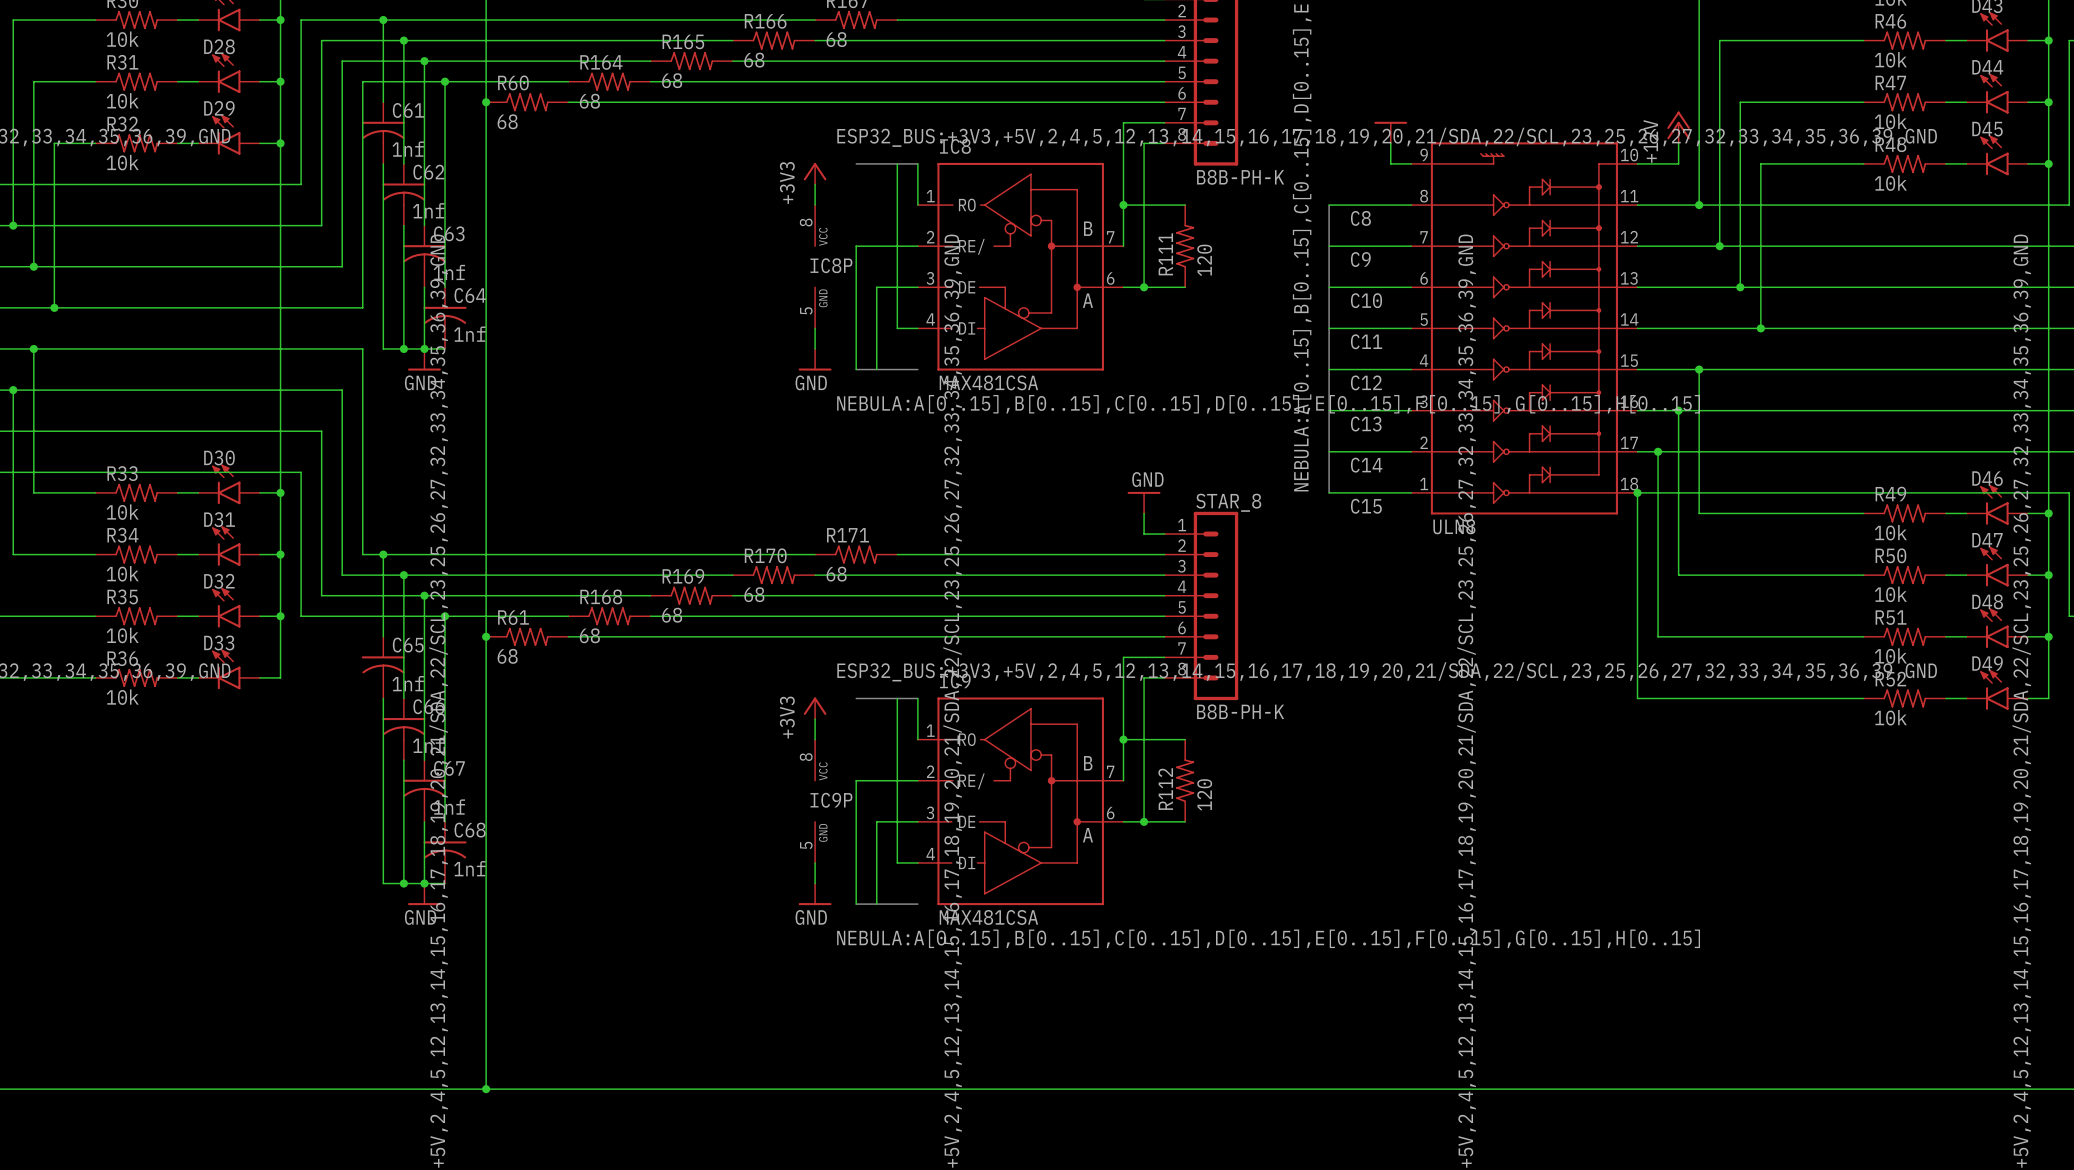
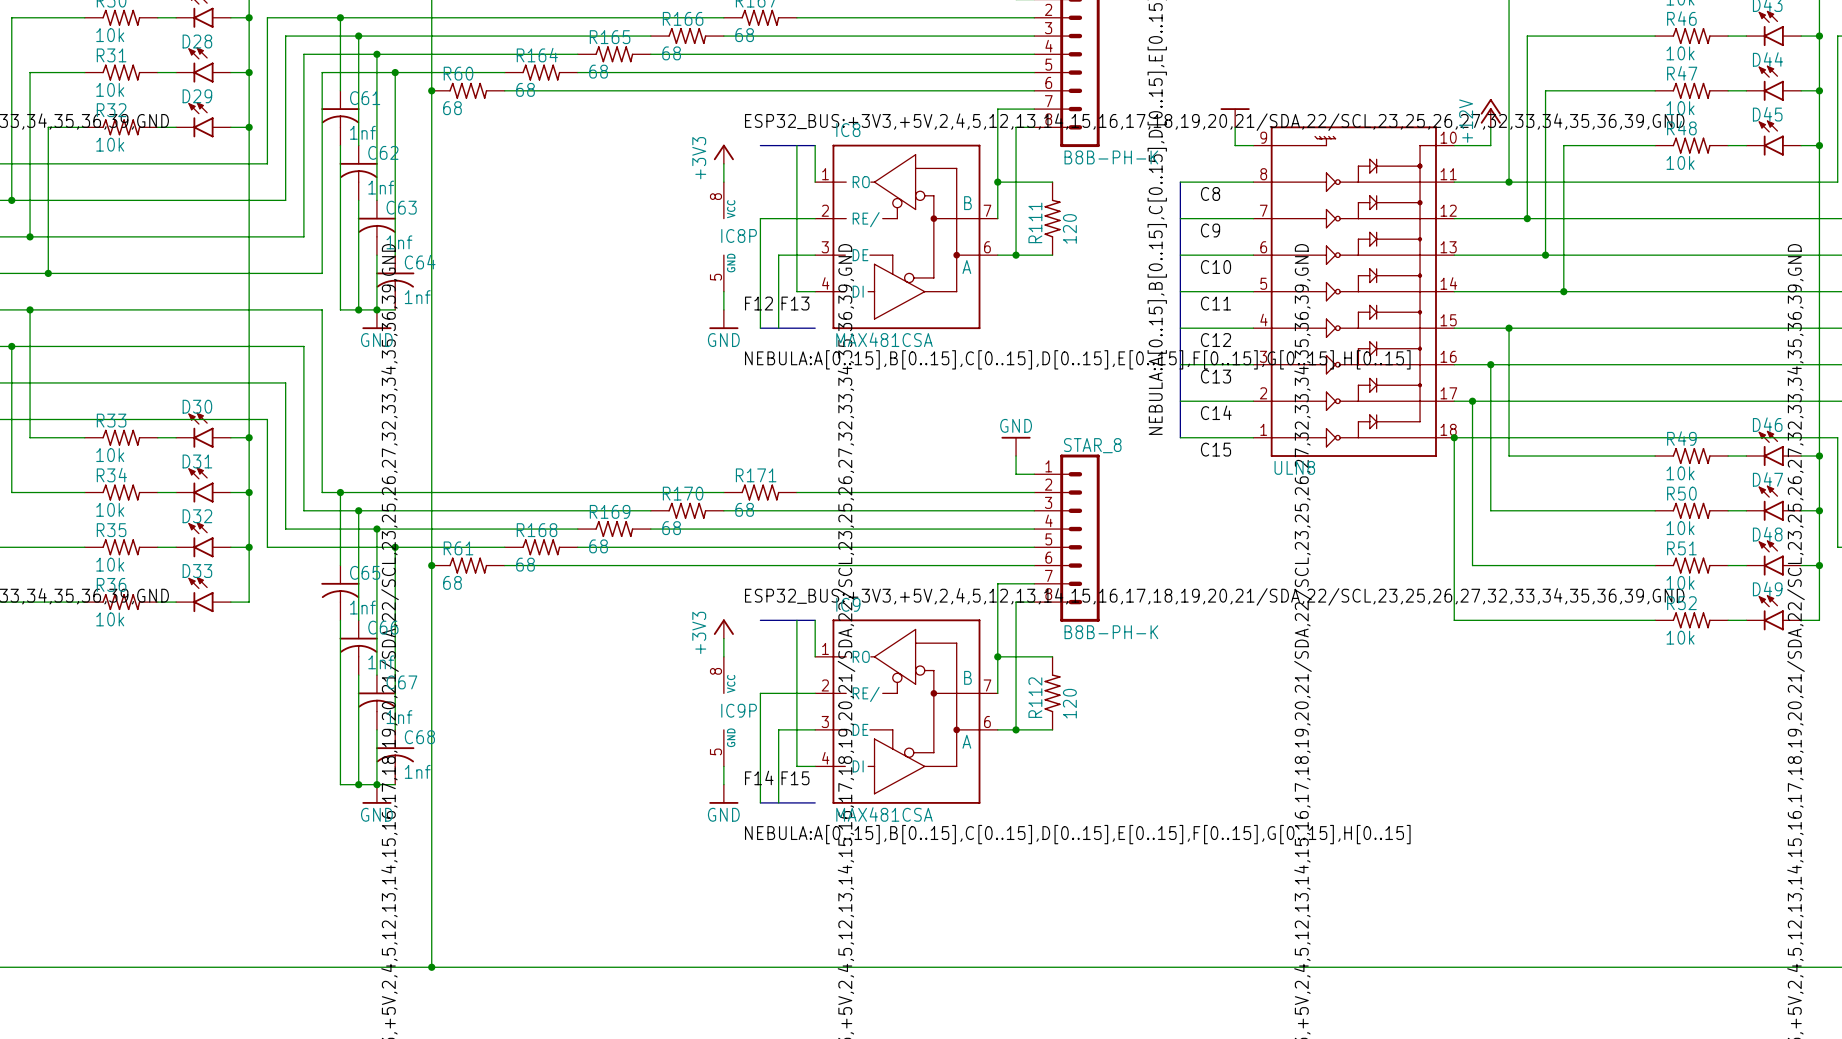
label: none -> F12 (758, 303)
label: none -> F13 (795, 303)
label: none -> F14 (759, 777)
label: none -> F15 (795, 778)

